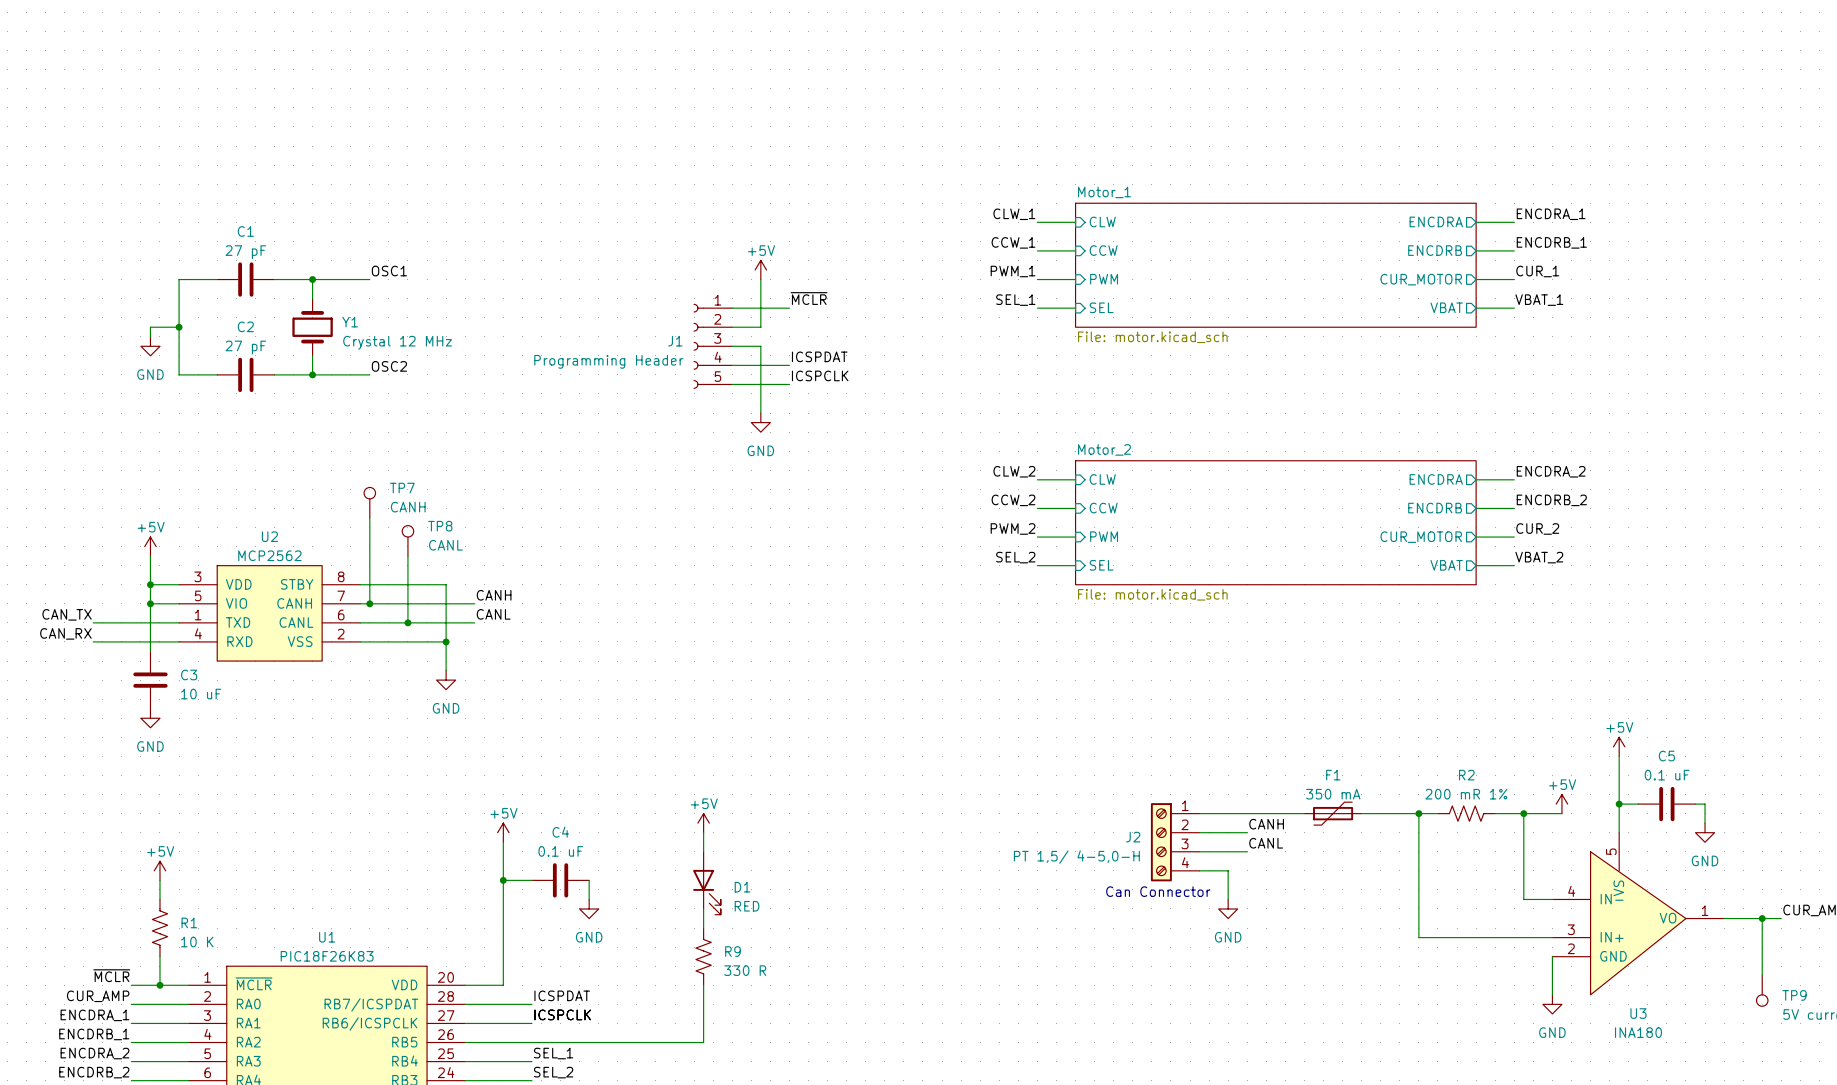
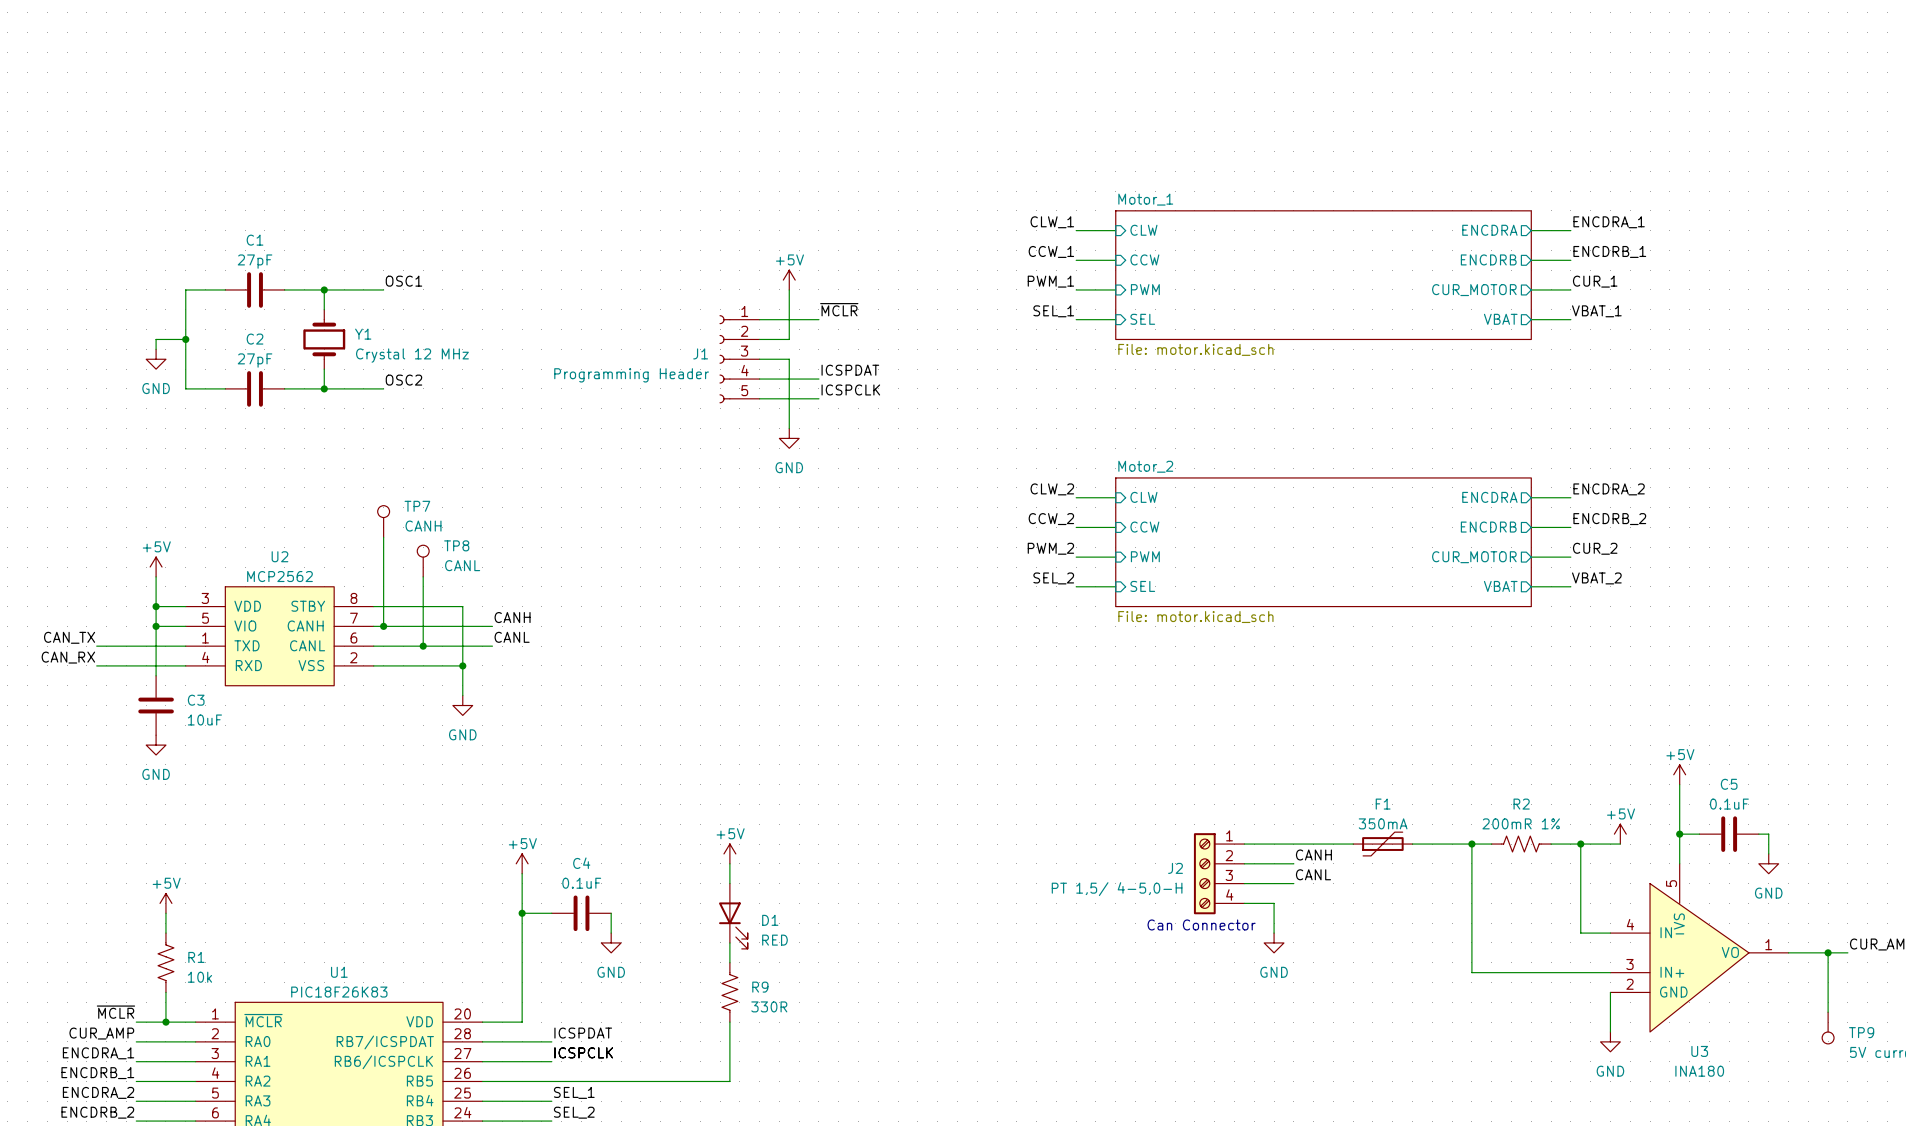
C1 value: 27 pF (245, 252) -> 27pF (255, 261)
C2 value: 27 pF (245, 347) -> 27pF (255, 360)
C3 value: 10 uF (201, 694) -> 10uF (204, 719)
C5 value: 0.1 uF (1667, 775) -> 0.1uF (1729, 804)
F1 value: 350 mA (1333, 794) -> 350mA (1383, 823)
R2 value: 200 mR 1% (1466, 794) -> 200mR 1% (1521, 823)
C4 value: 0.1 uF (560, 851) -> 0.1uF (581, 883)
R1 value: 10 K (197, 942) -> 10k (199, 977)
R9 value: 330 R (745, 970) -> 330R (769, 1006)

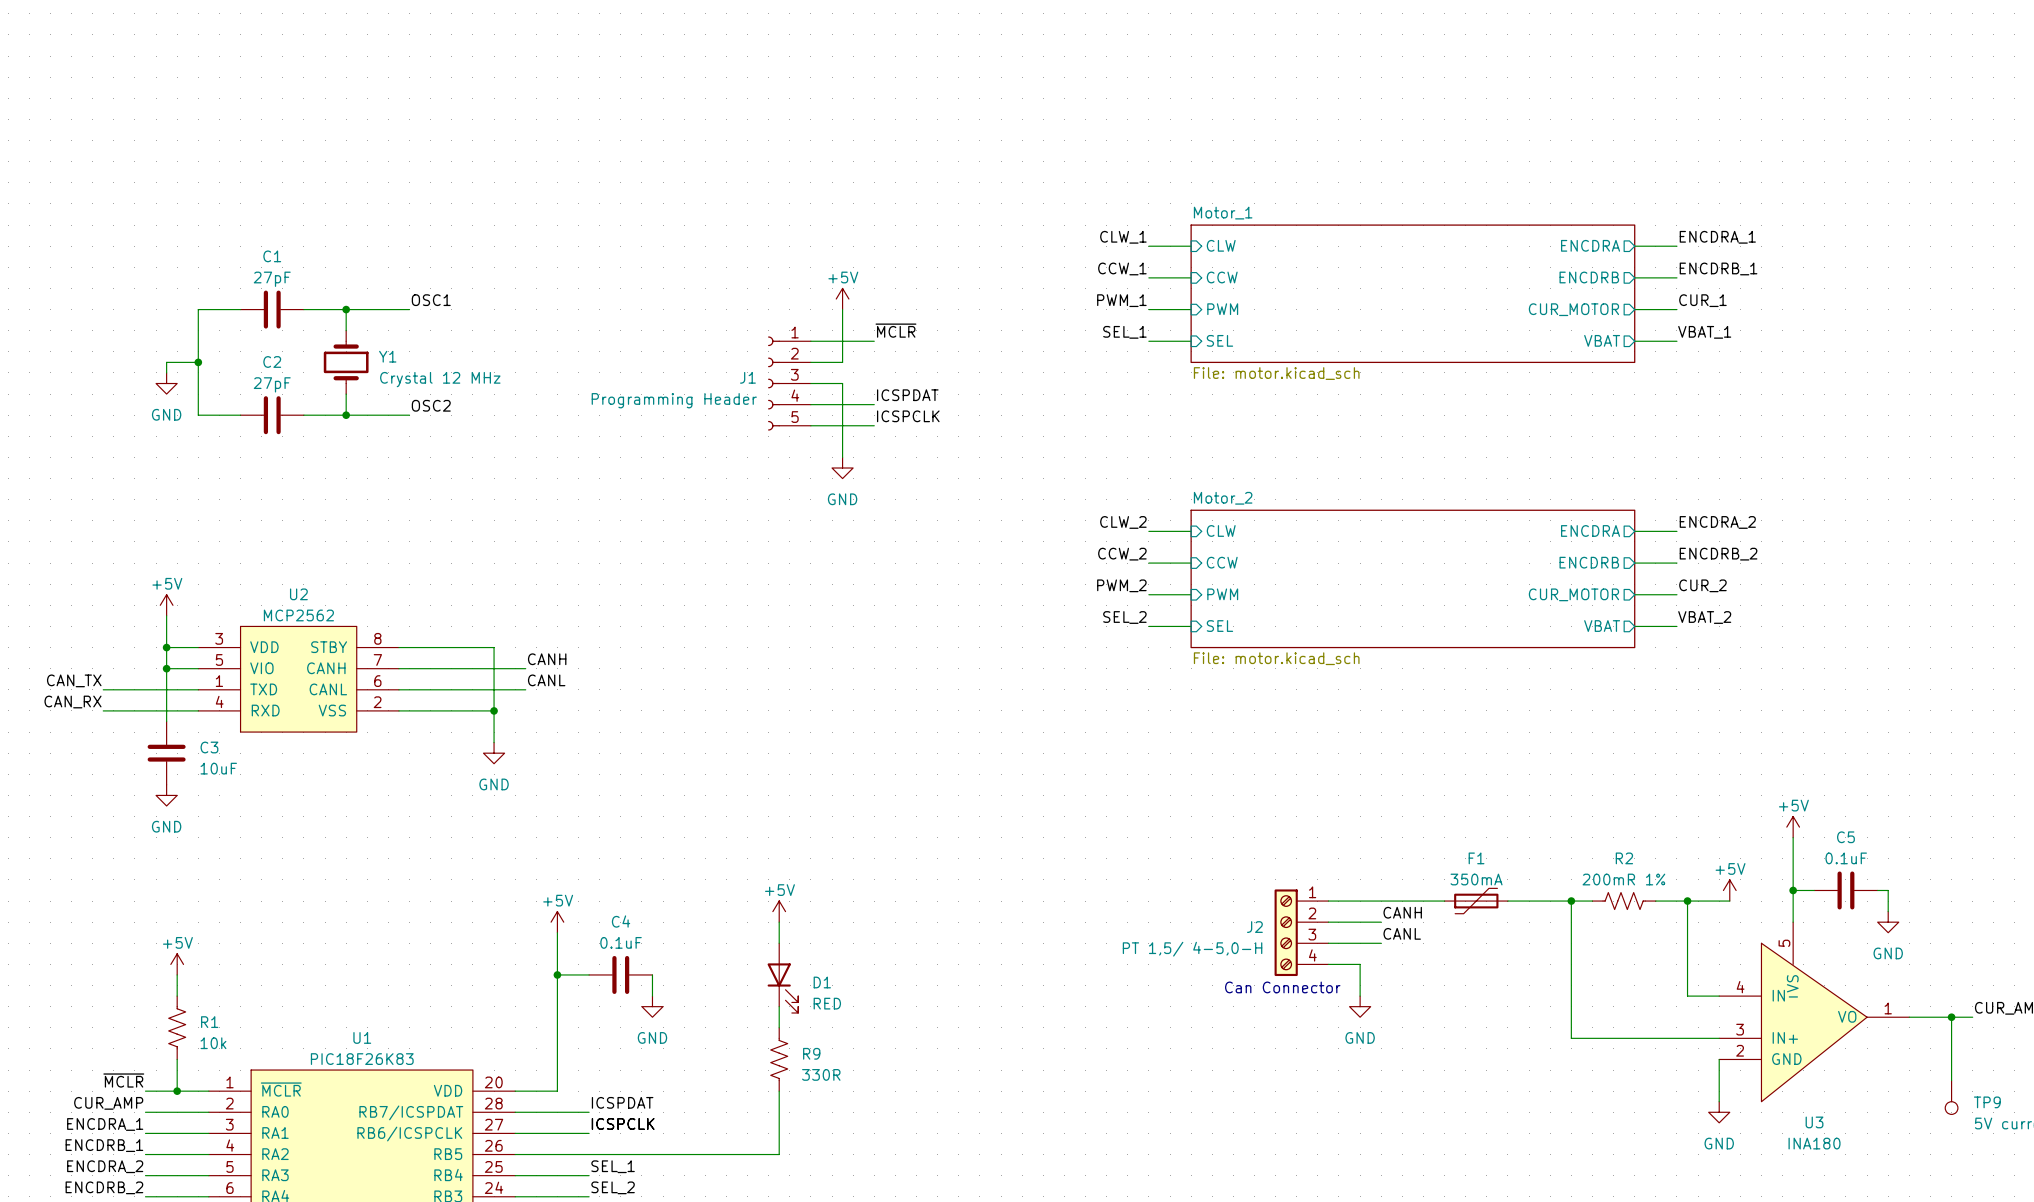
TP7: CANH (383, 521) -> none
wire: (383, 537) (383, 626) -> none
TP8: CANL (423, 561) -> none
wire: (423, 576) (423, 646) -> none
junction: (383, 626) -> none
junction: (423, 646) -> none

